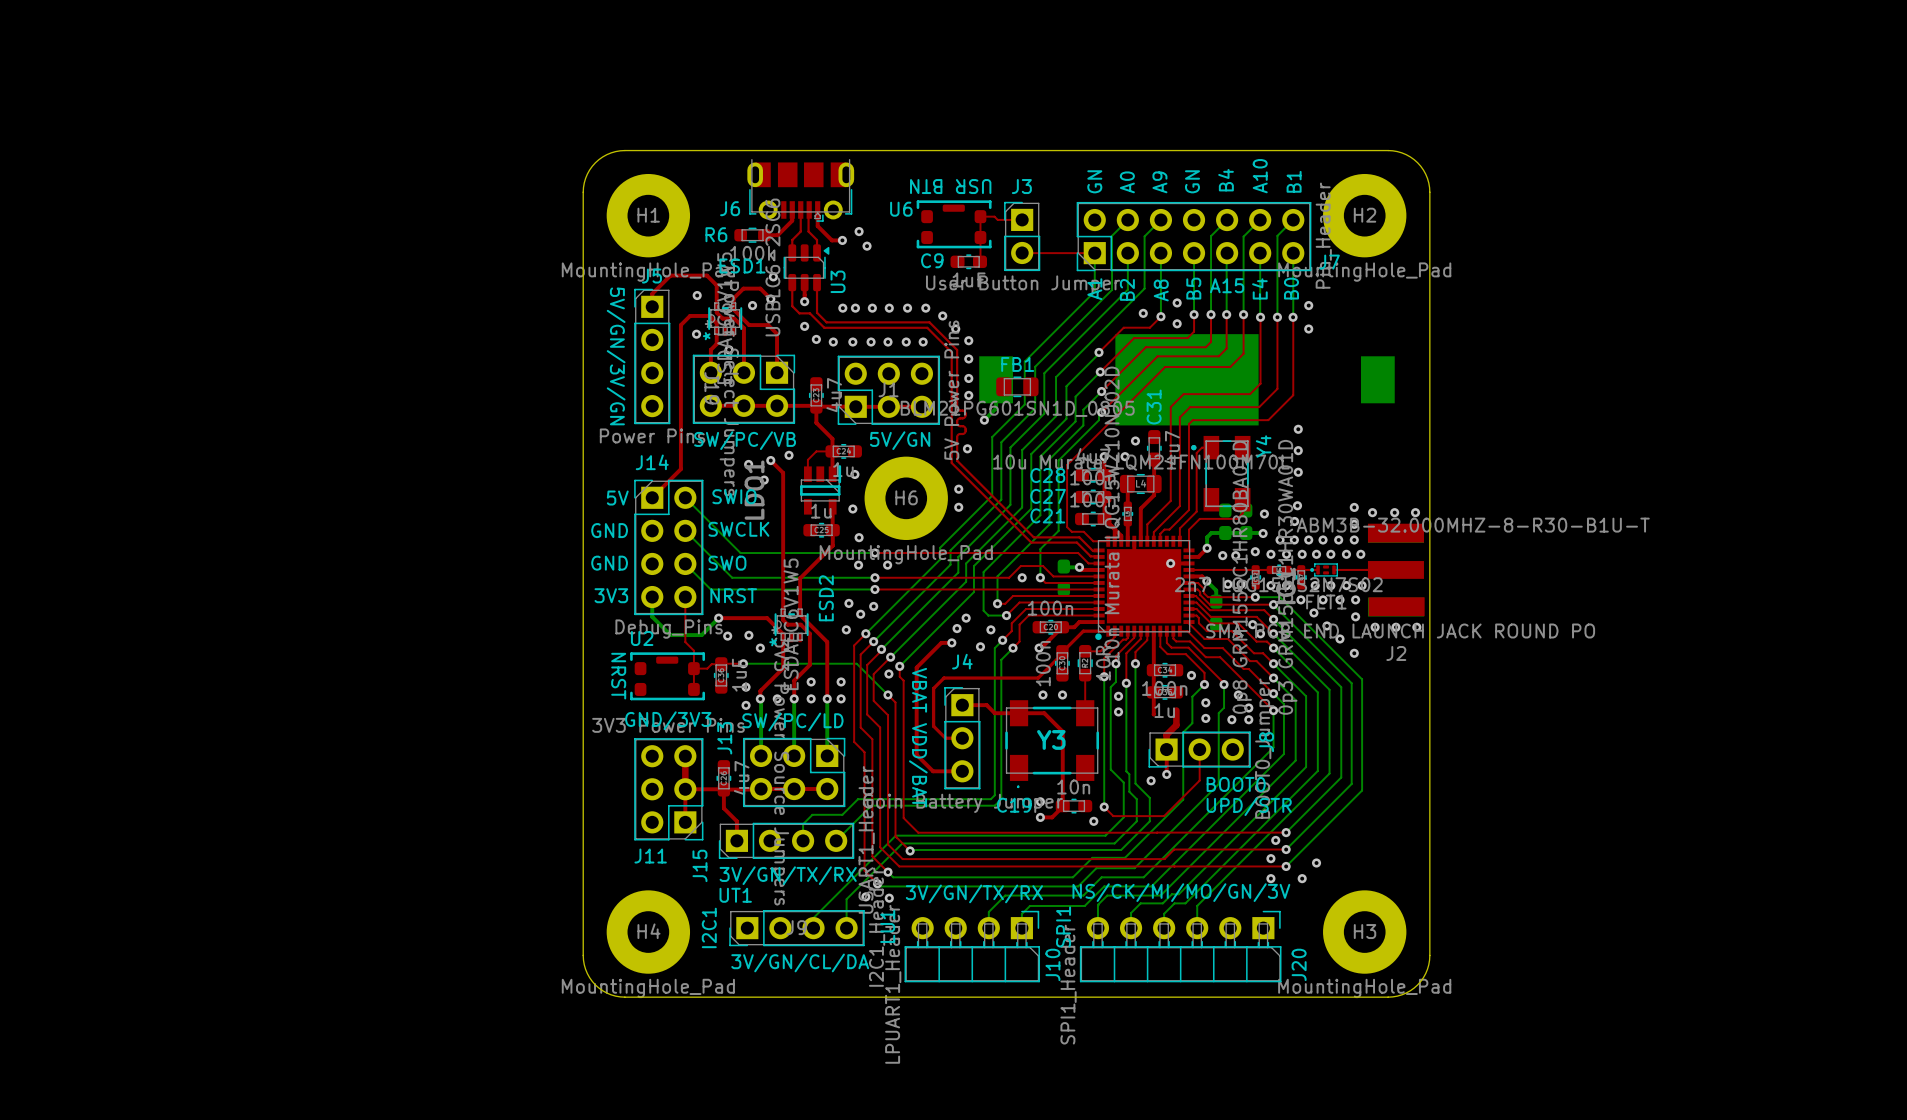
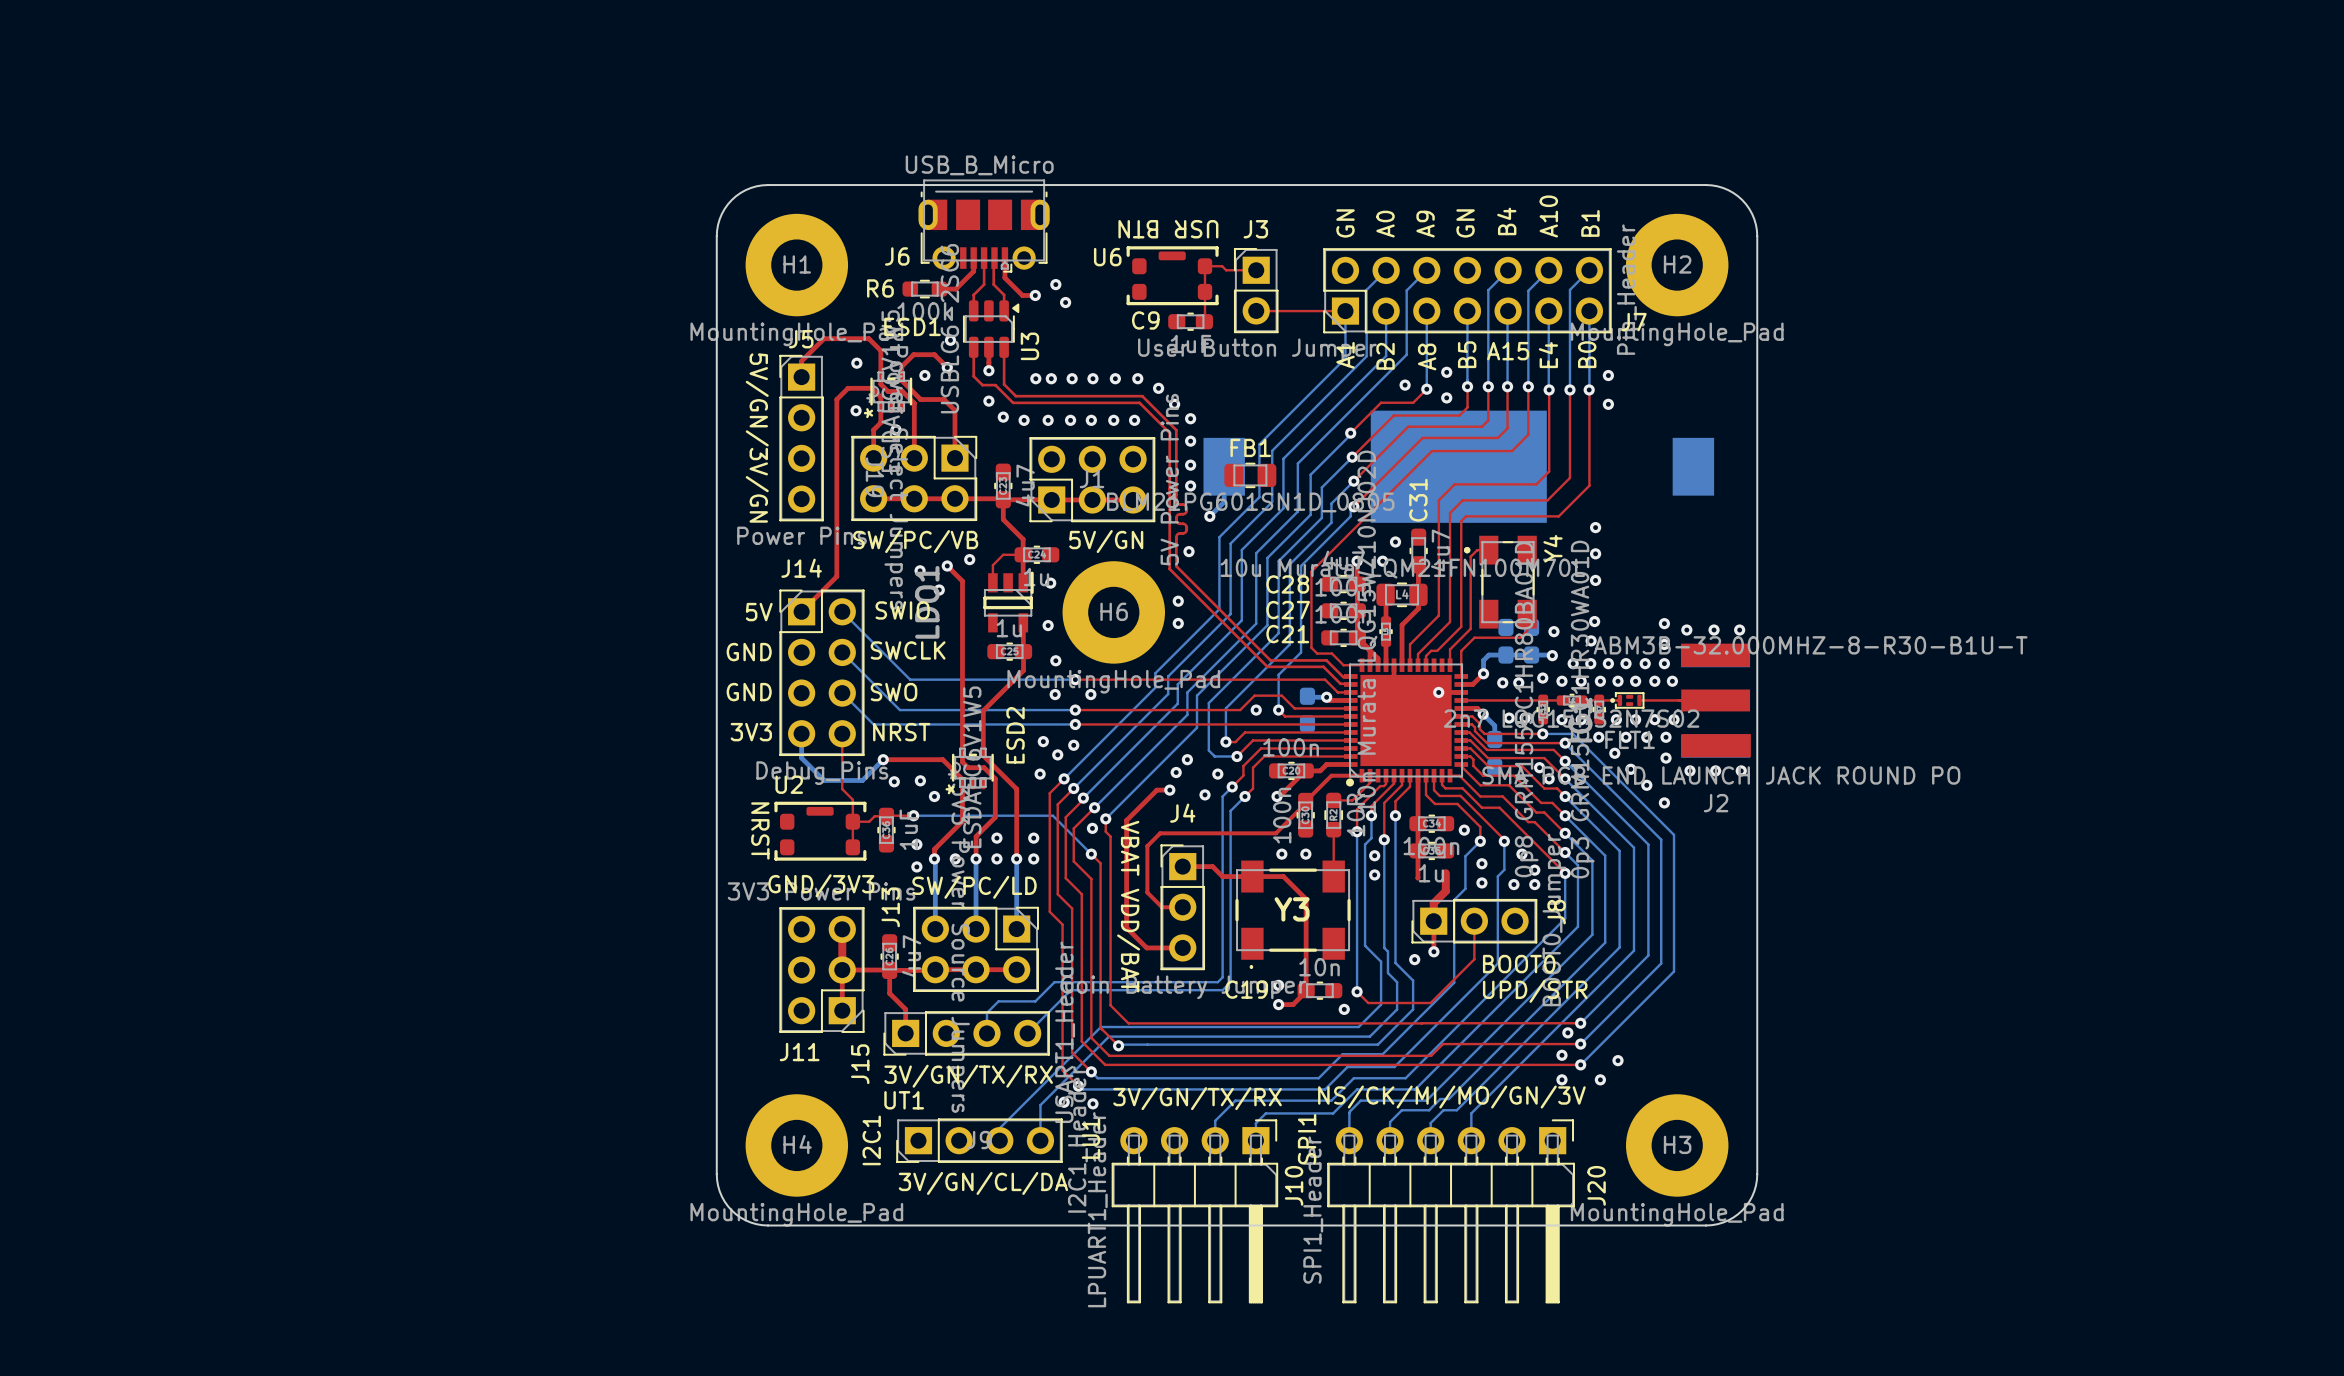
J6 value: none -> USB_B_Micro (979, 165)
J6 footprint: [747, 159, 855, 222] -> [918, 179, 1050, 273]
J10 footprint: [904, 910, 1041, 983] -> [1111, 1119, 1279, 1304]
J20 footprint: [1079, 910, 1282, 983] -> [1327, 1119, 1575, 1304]

